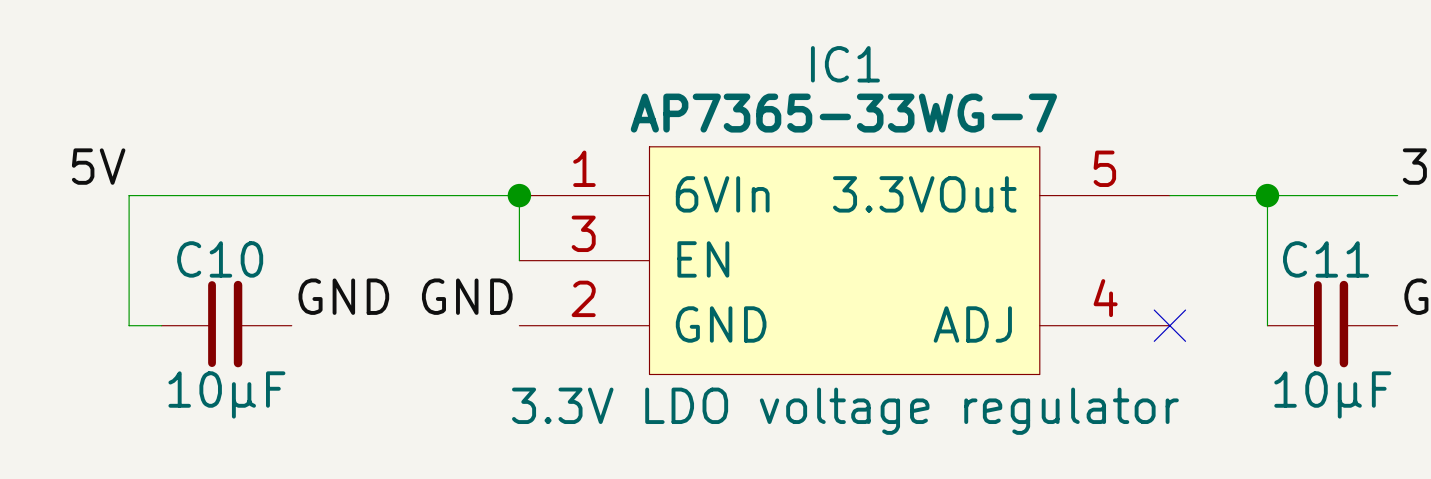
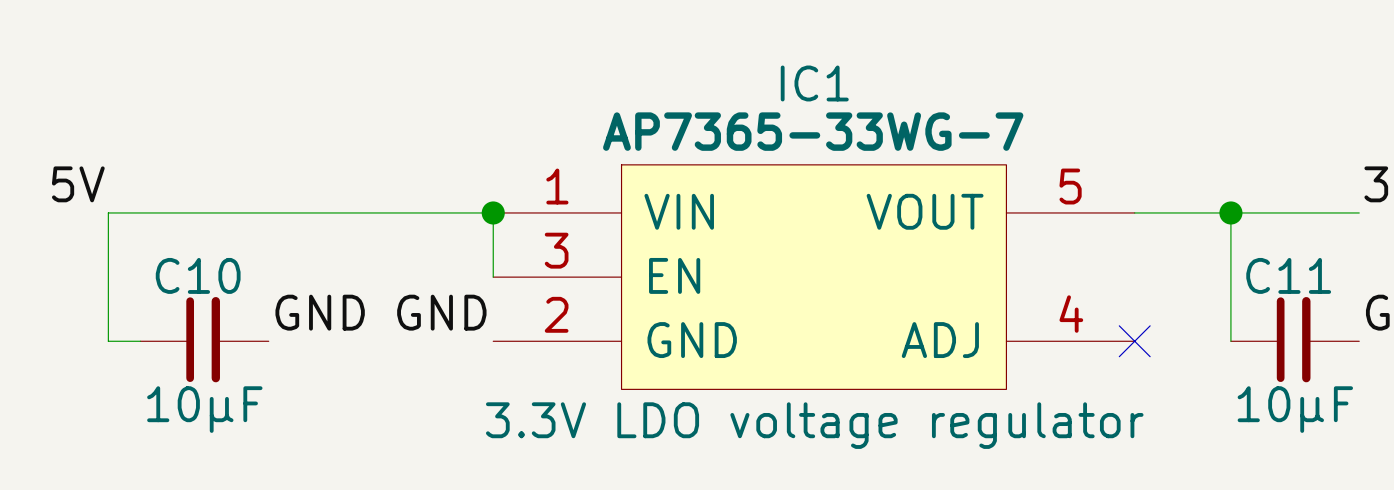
IC1 pin name: 6VIn (722, 194) -> VIN (679, 211)
IC1 pin name: 3.3VOut (924, 194) -> VOUT (925, 211)

